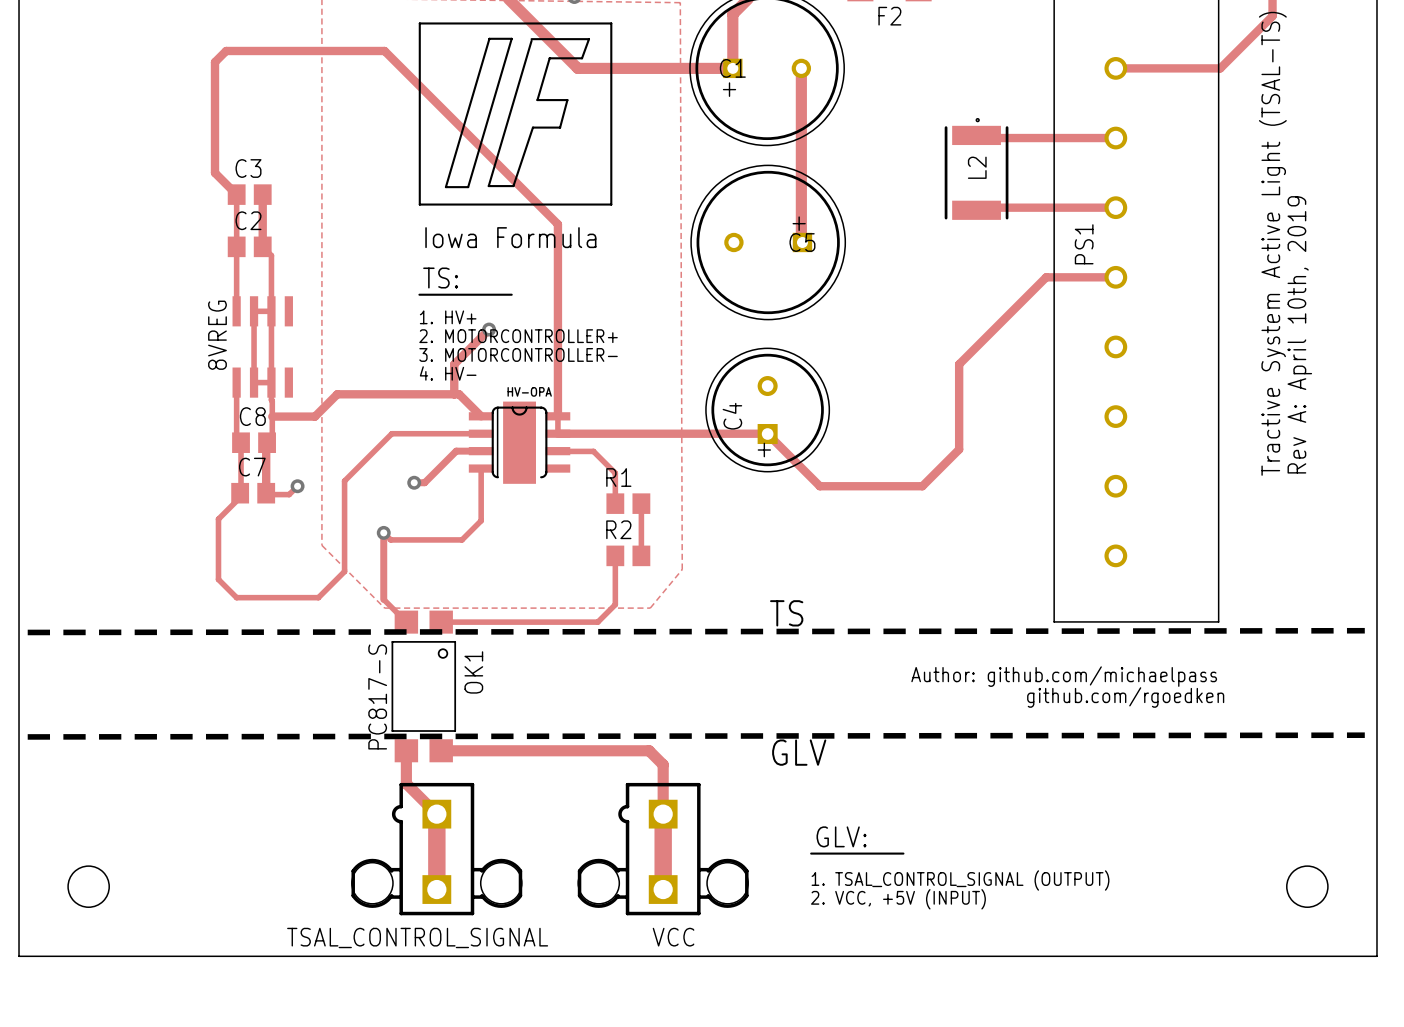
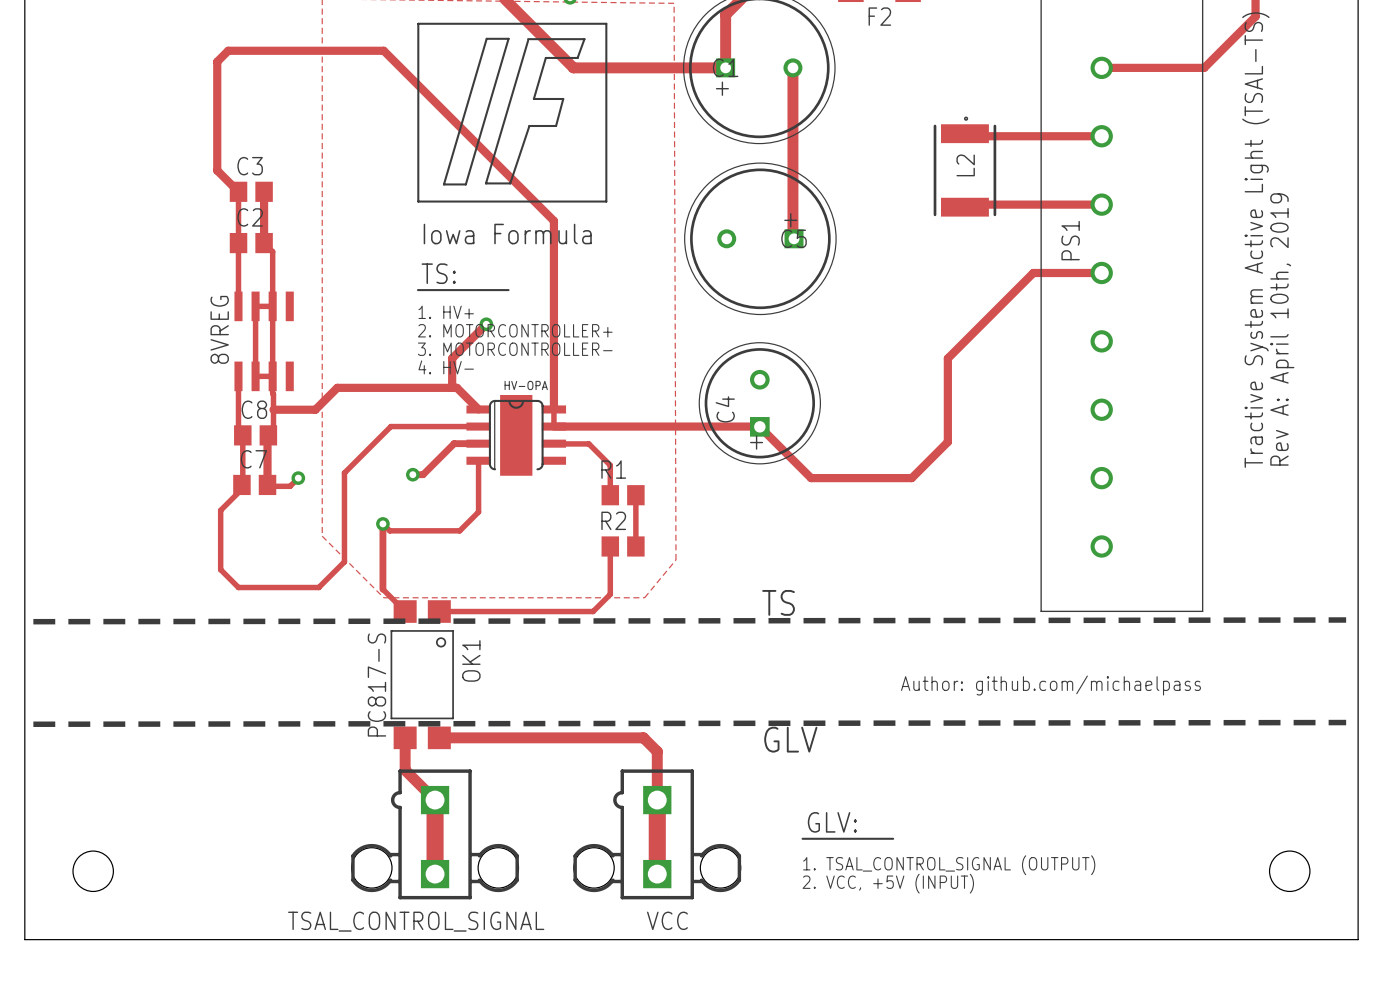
text: Author: github.com/michaelpass (1064, 676) -> none
text: github.com/rgoedken (1125, 697) -> Author: github.com/michaelpass (1050, 685)

